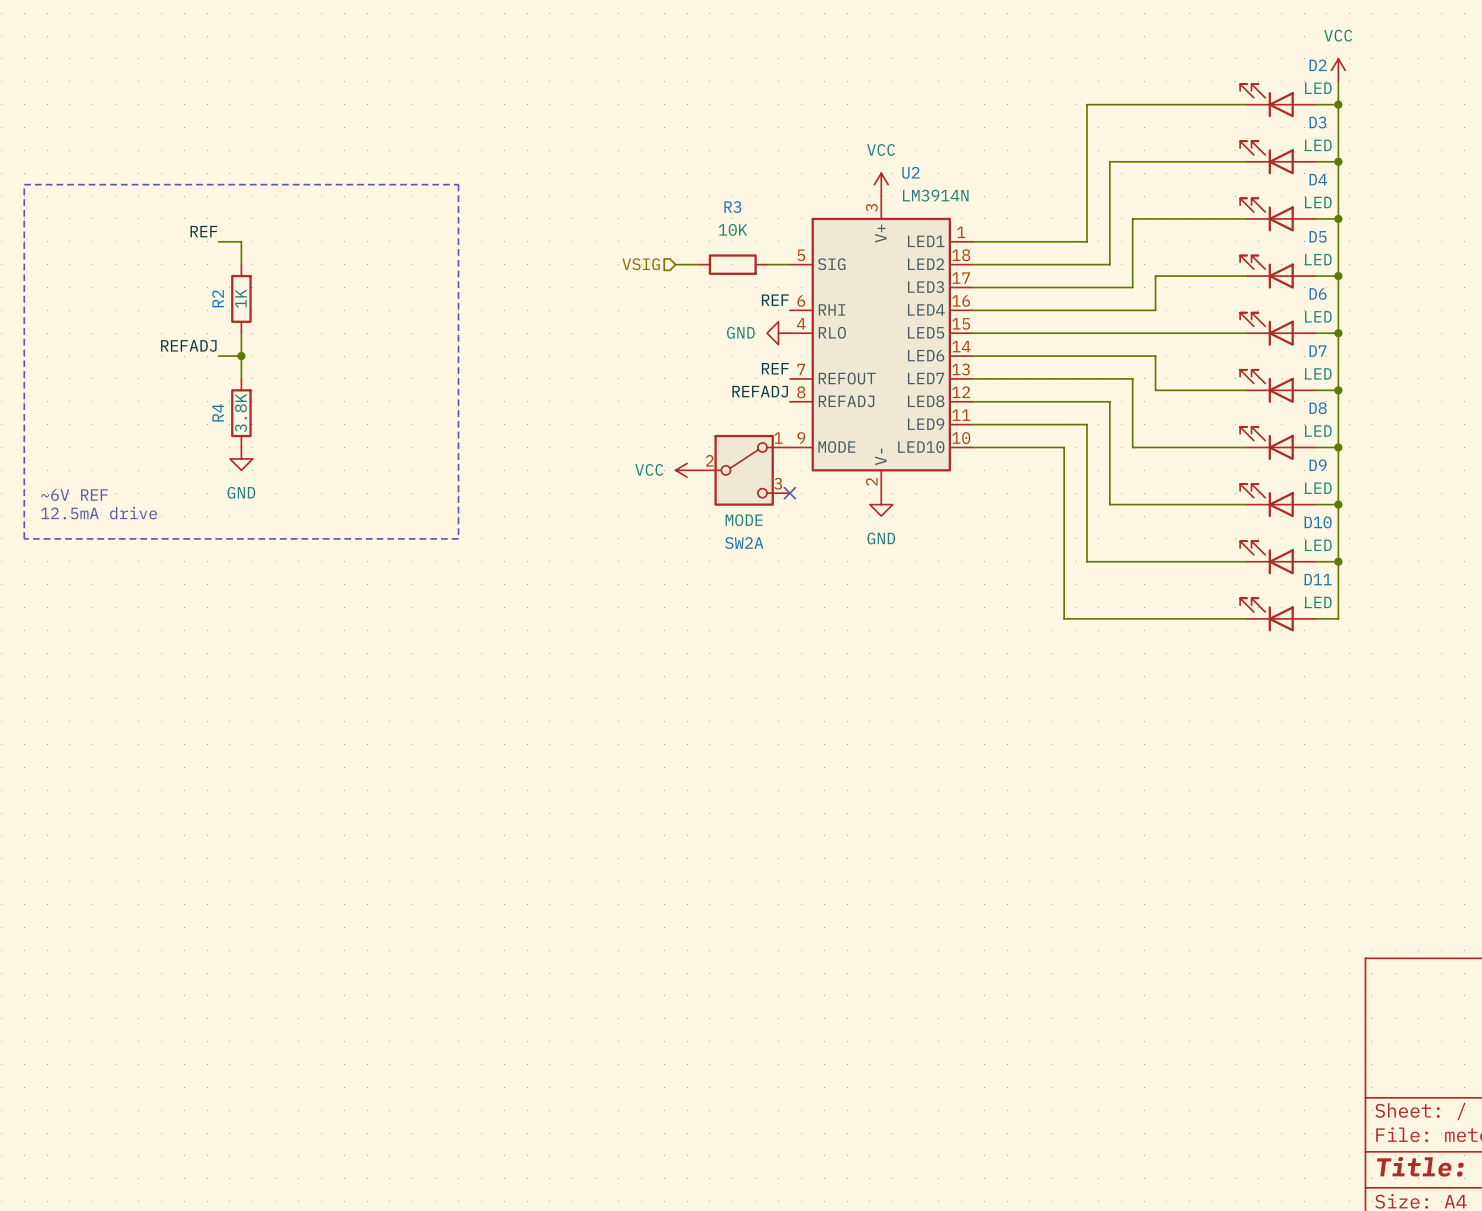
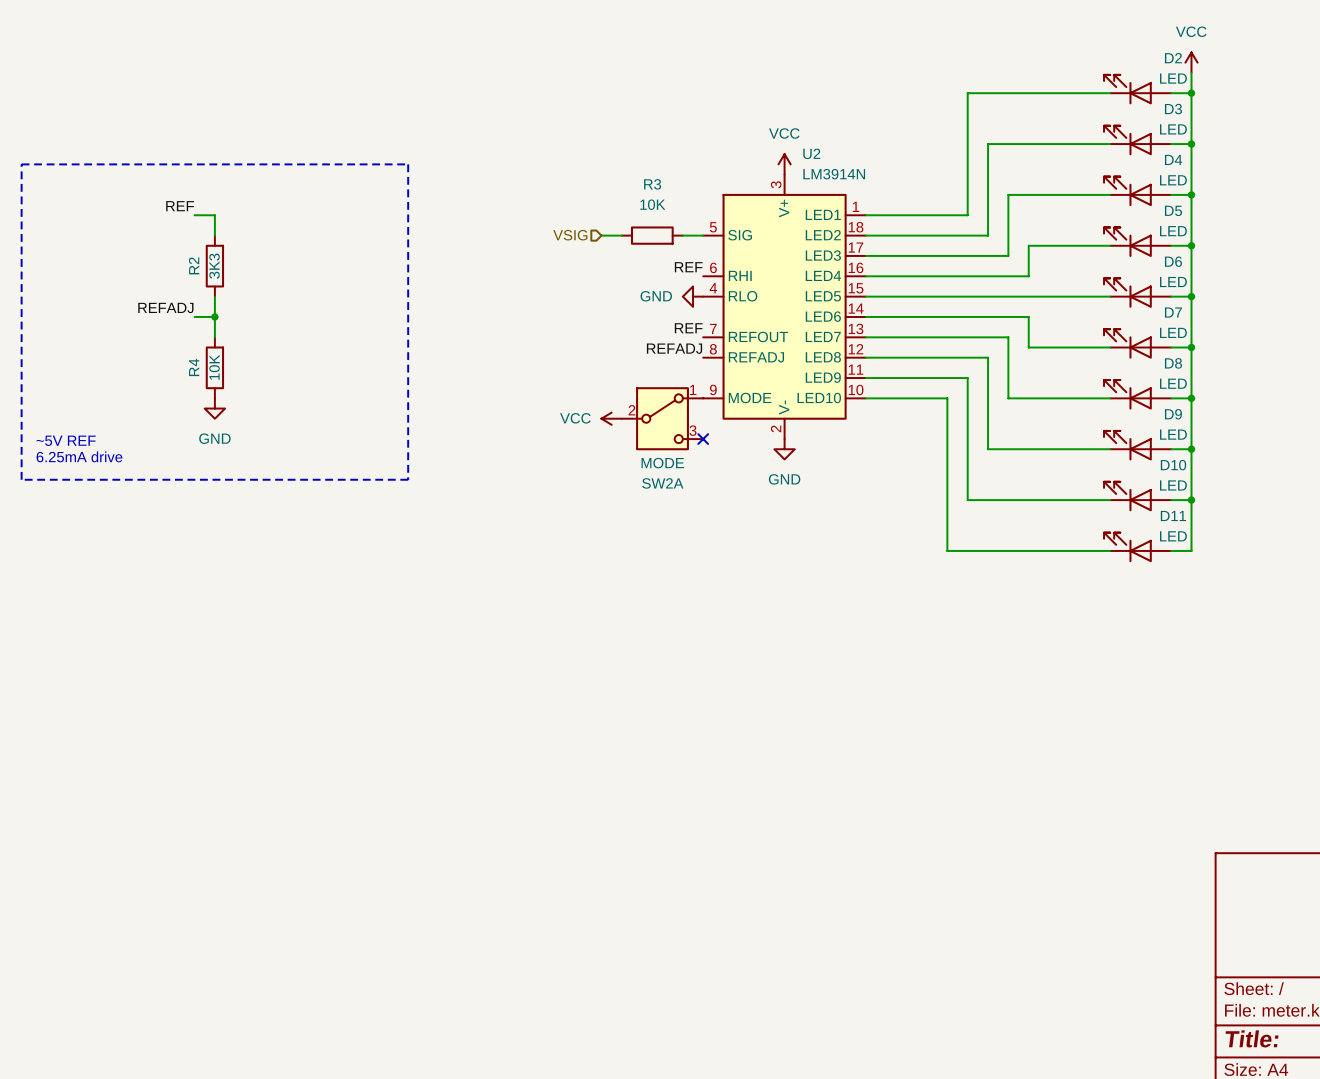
R2 value: 1K (240, 298) -> 3K3 (214, 266)
R4 value: 3.8K (240, 412) -> 10K (214, 367)
text: ~6V REF (74, 495) -> ~5V REF (66, 440)
text: 12.5mA drive (99, 513) -> 6.25mA drive (79, 456)

